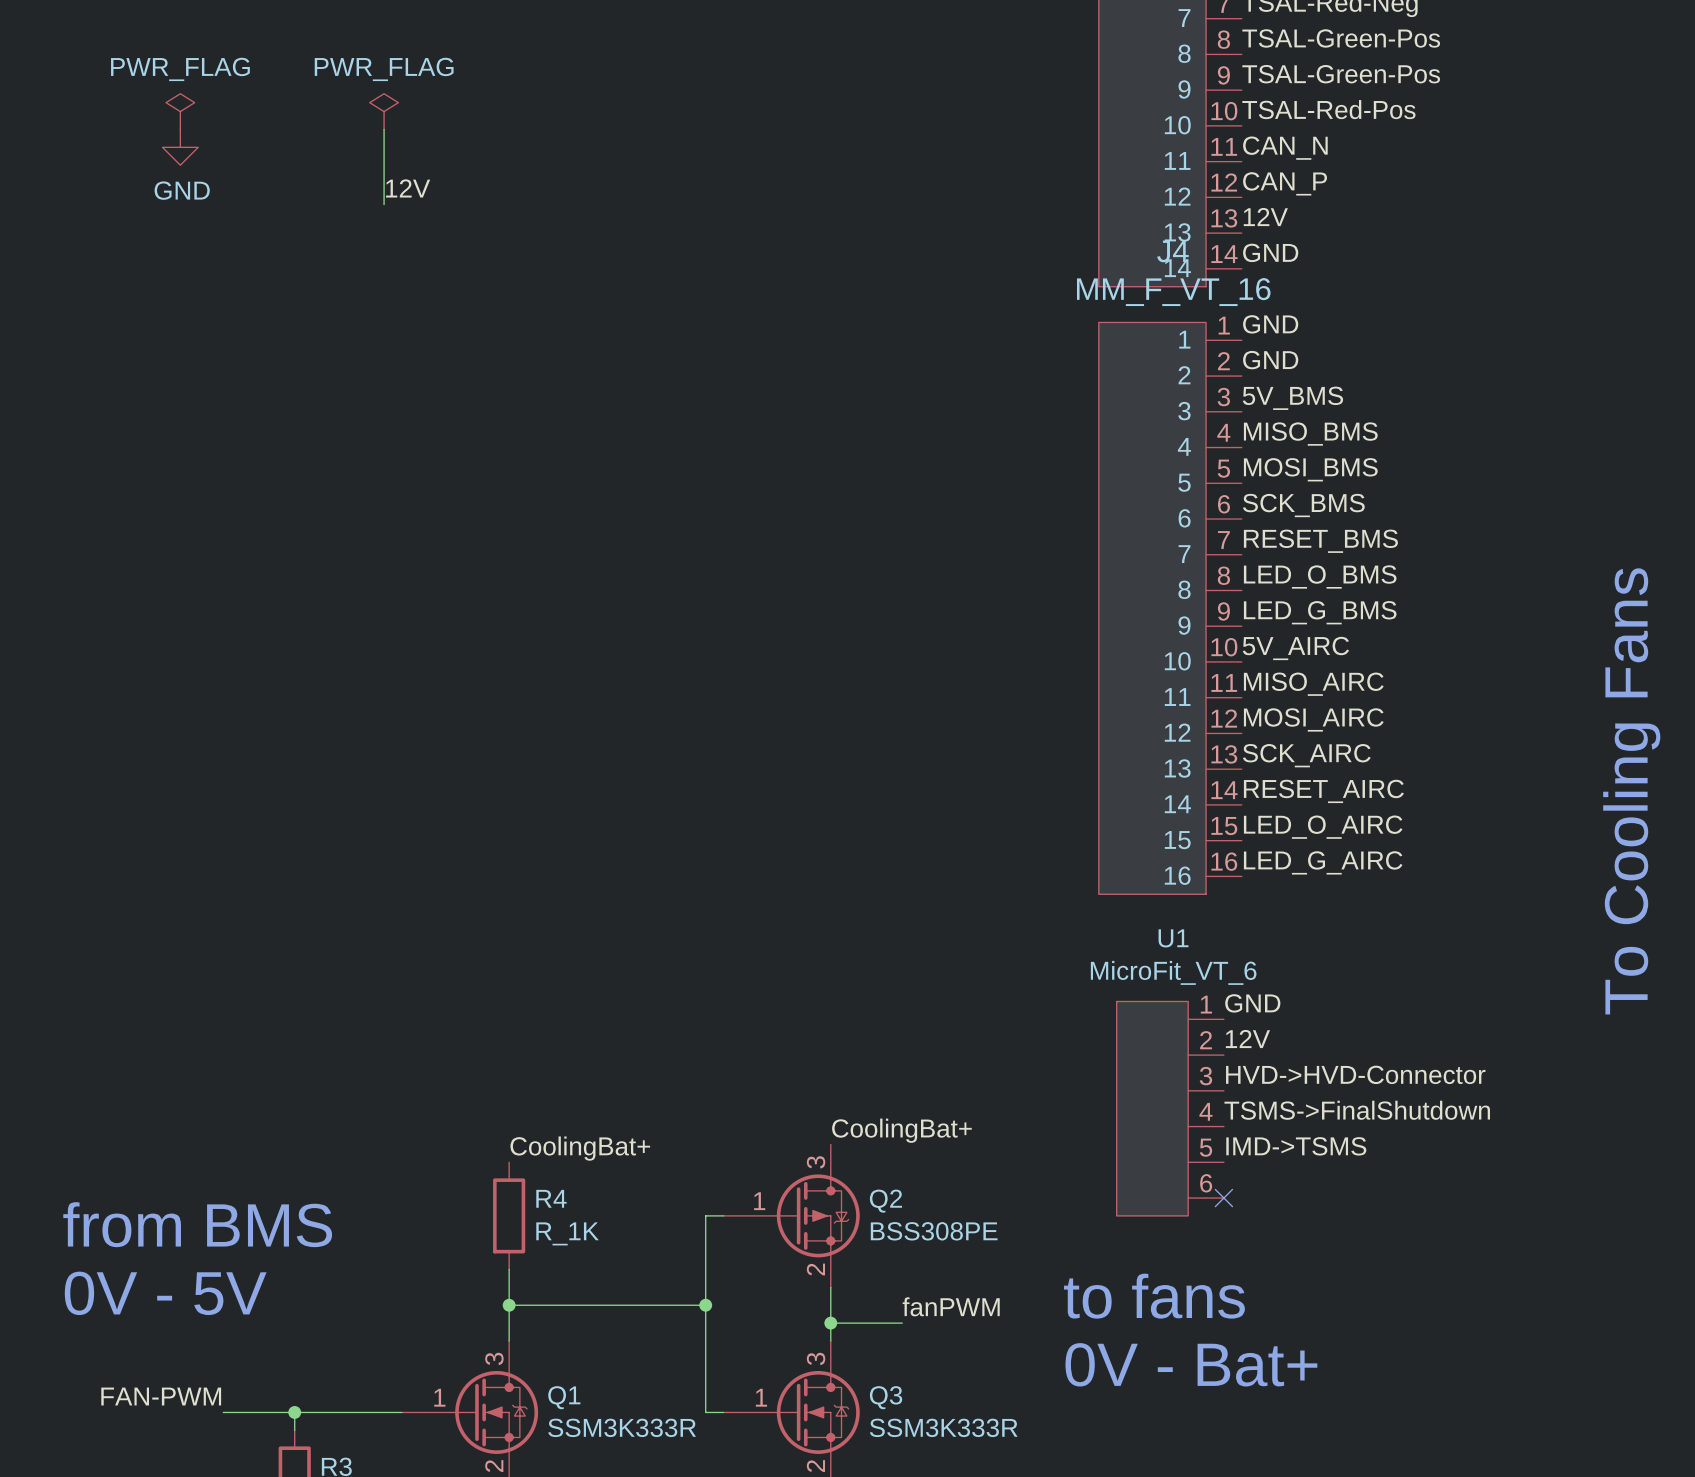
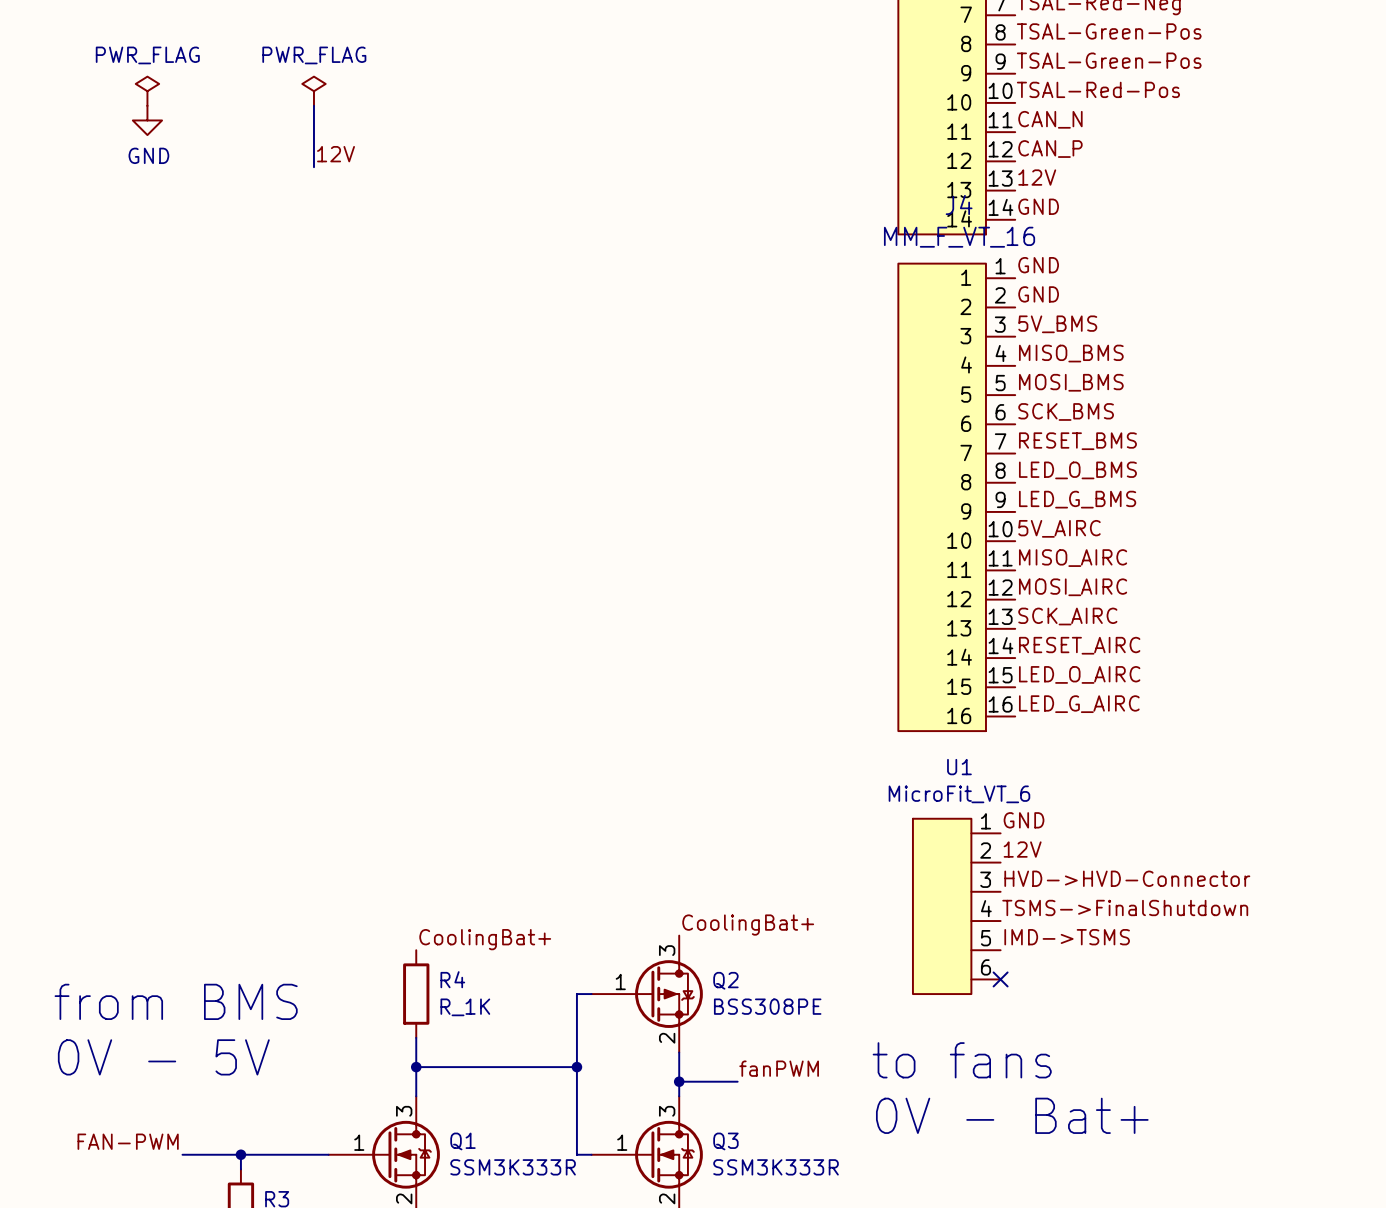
text: To Cooling Fans (1631, 791) -> none

